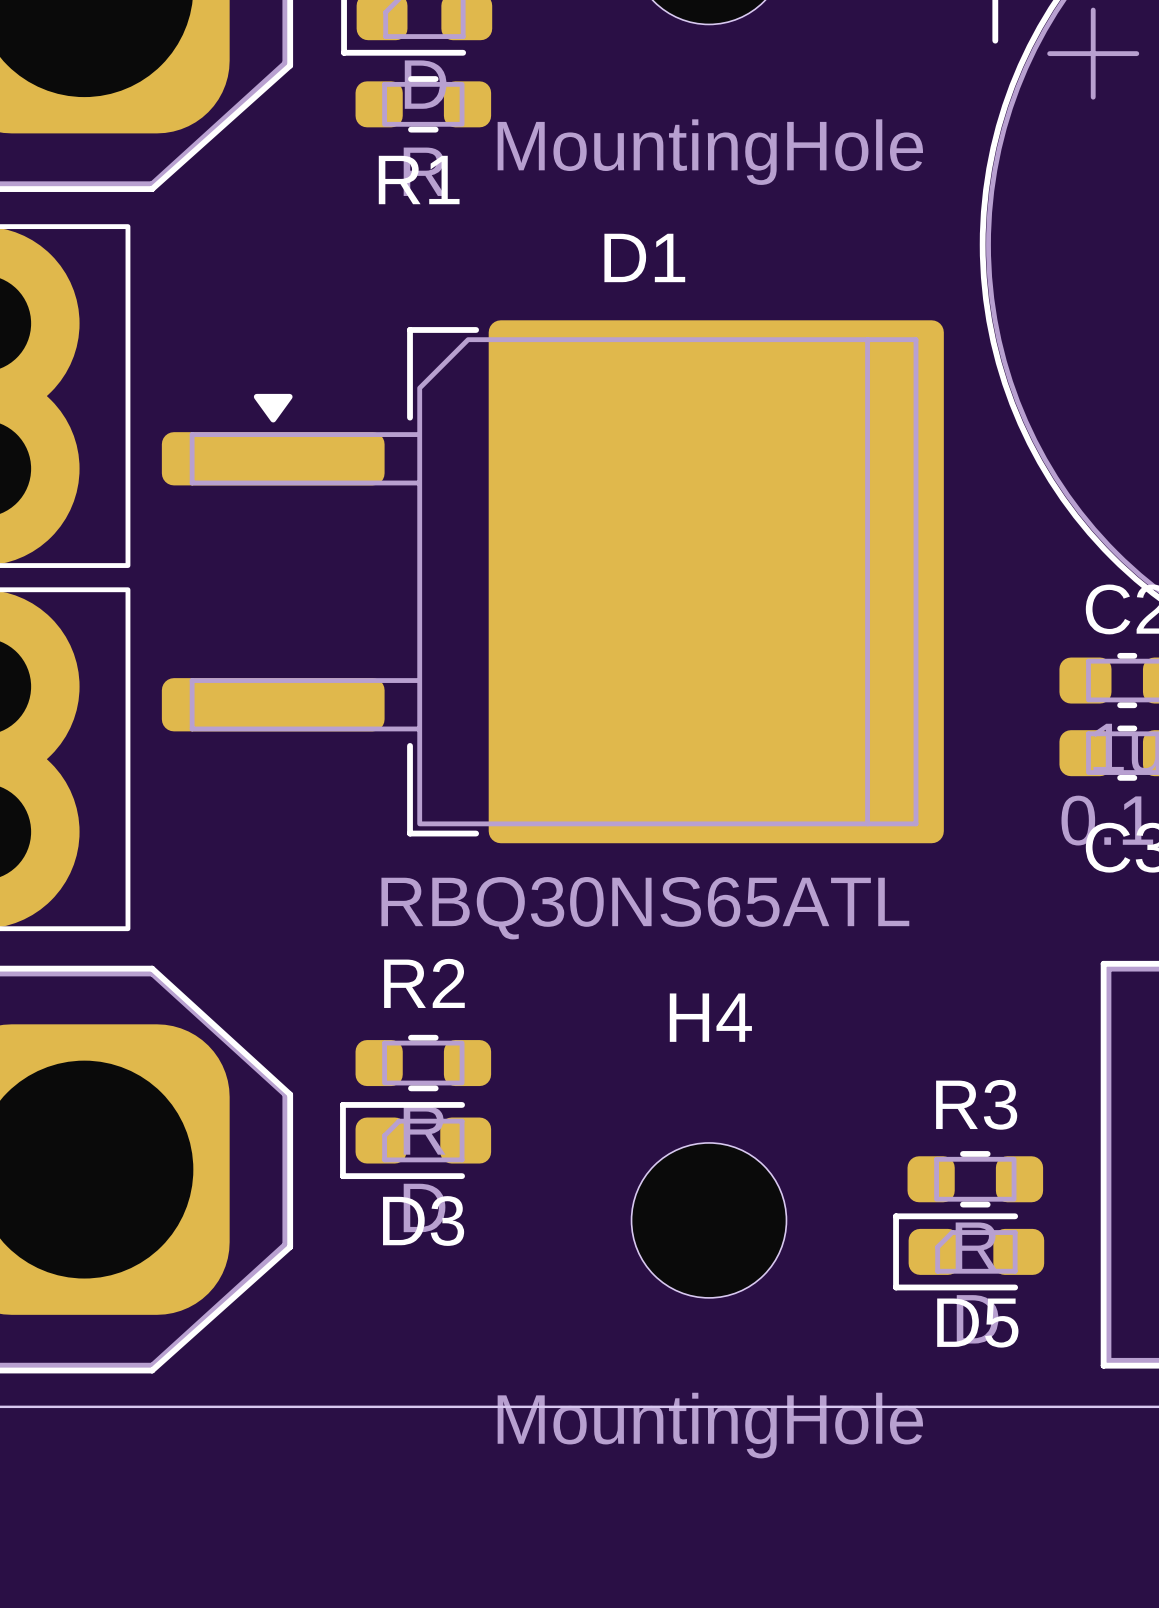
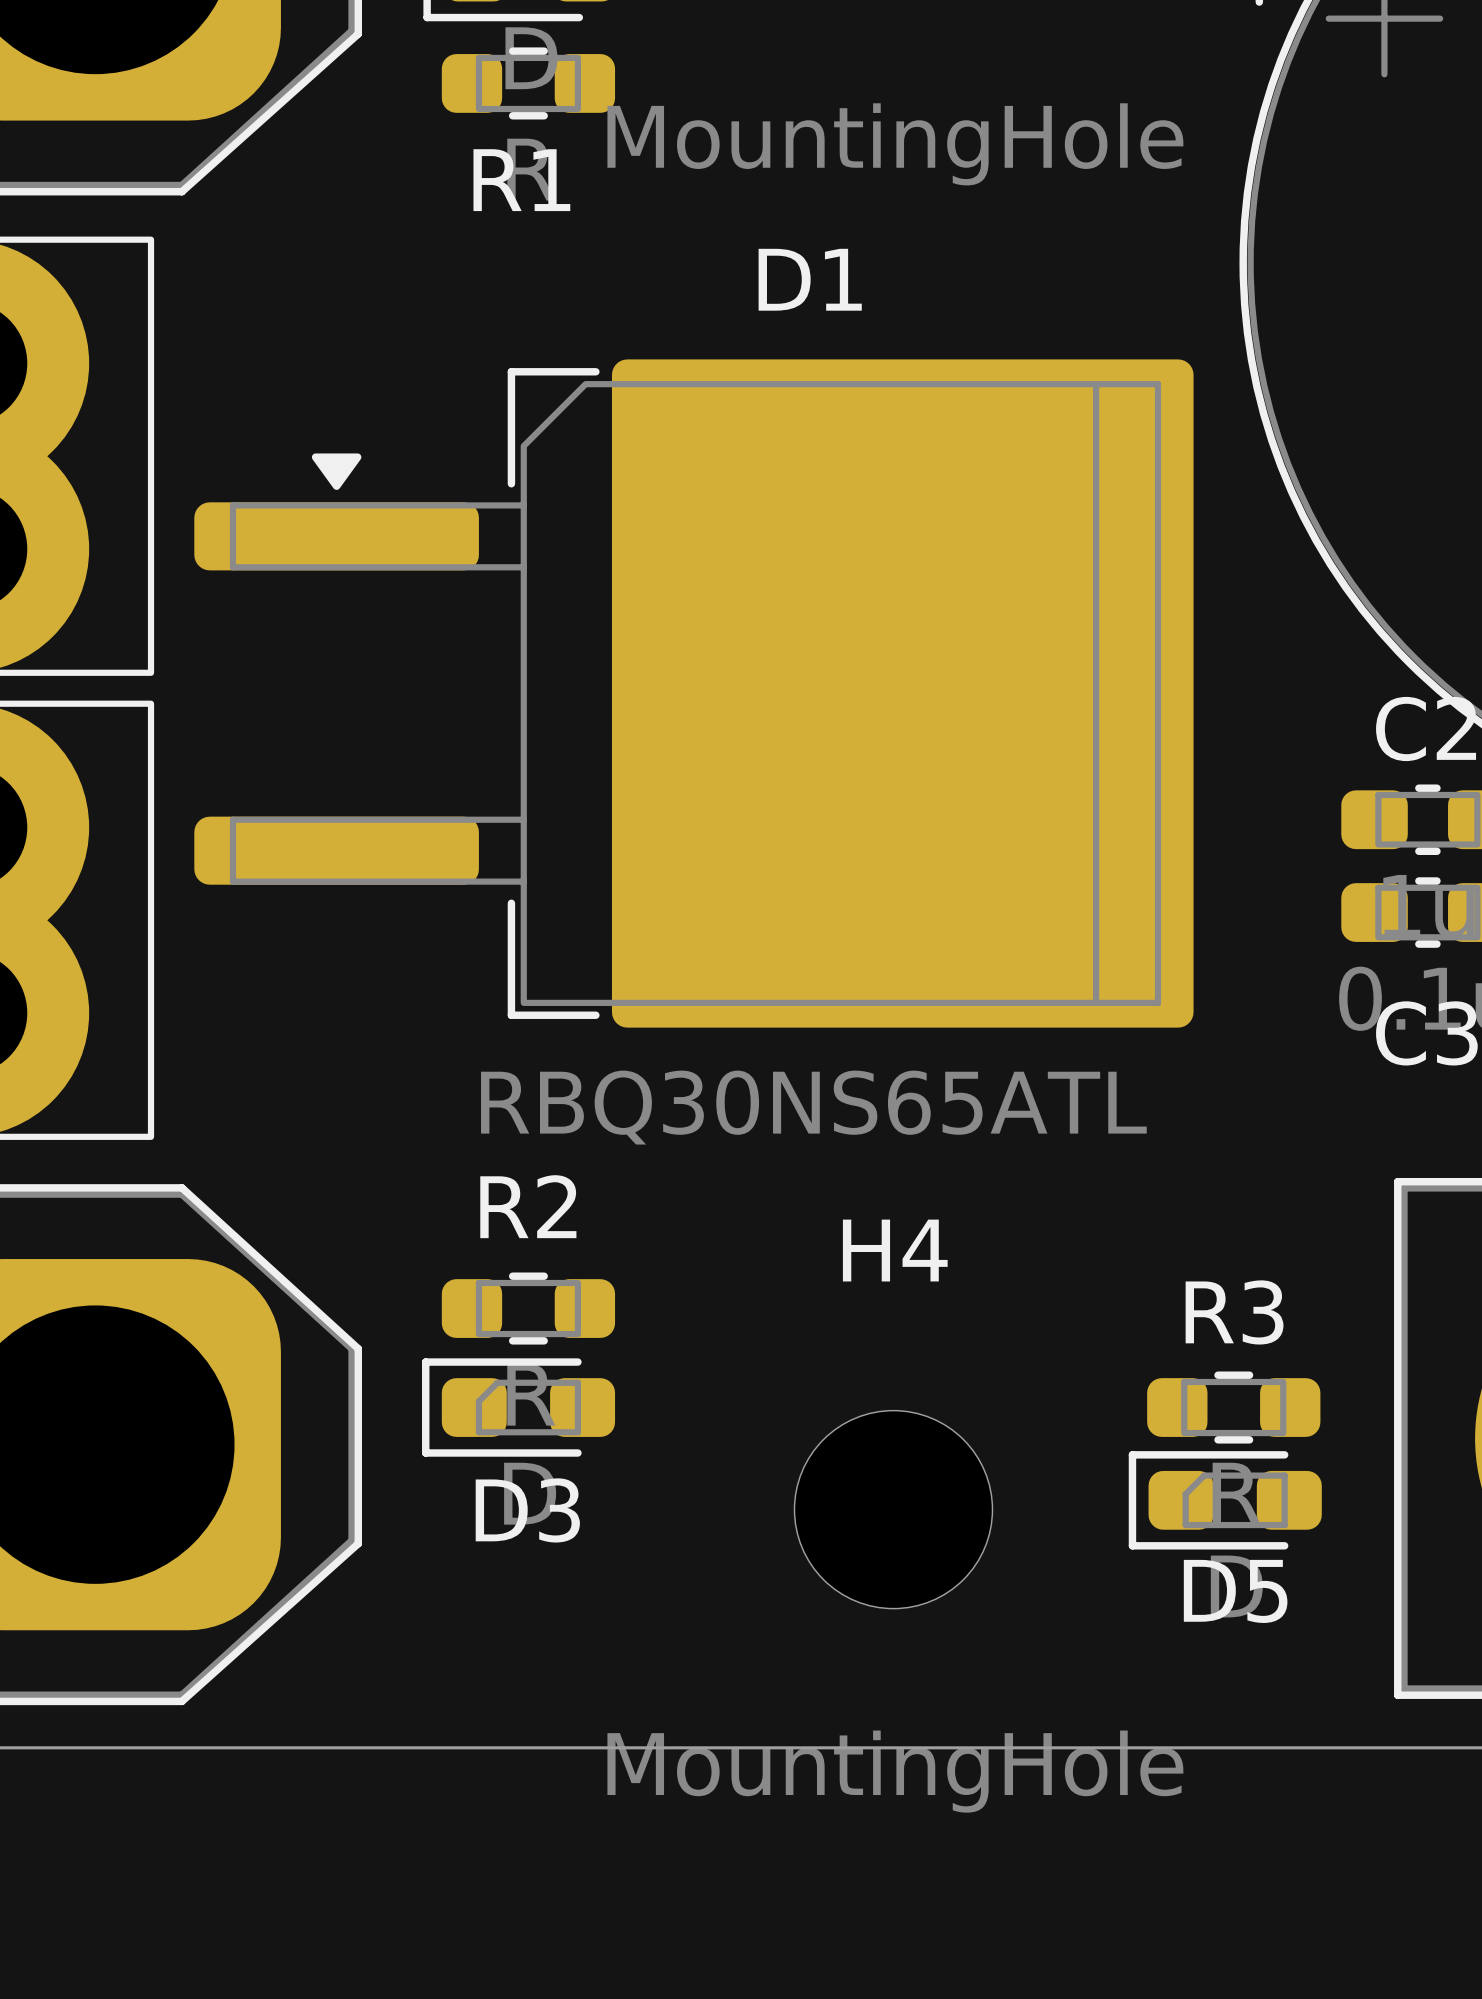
R3 position: (975, 1179) -> (1233, 1407)
D5 position: (968, 1251) -> (1225, 1500)

